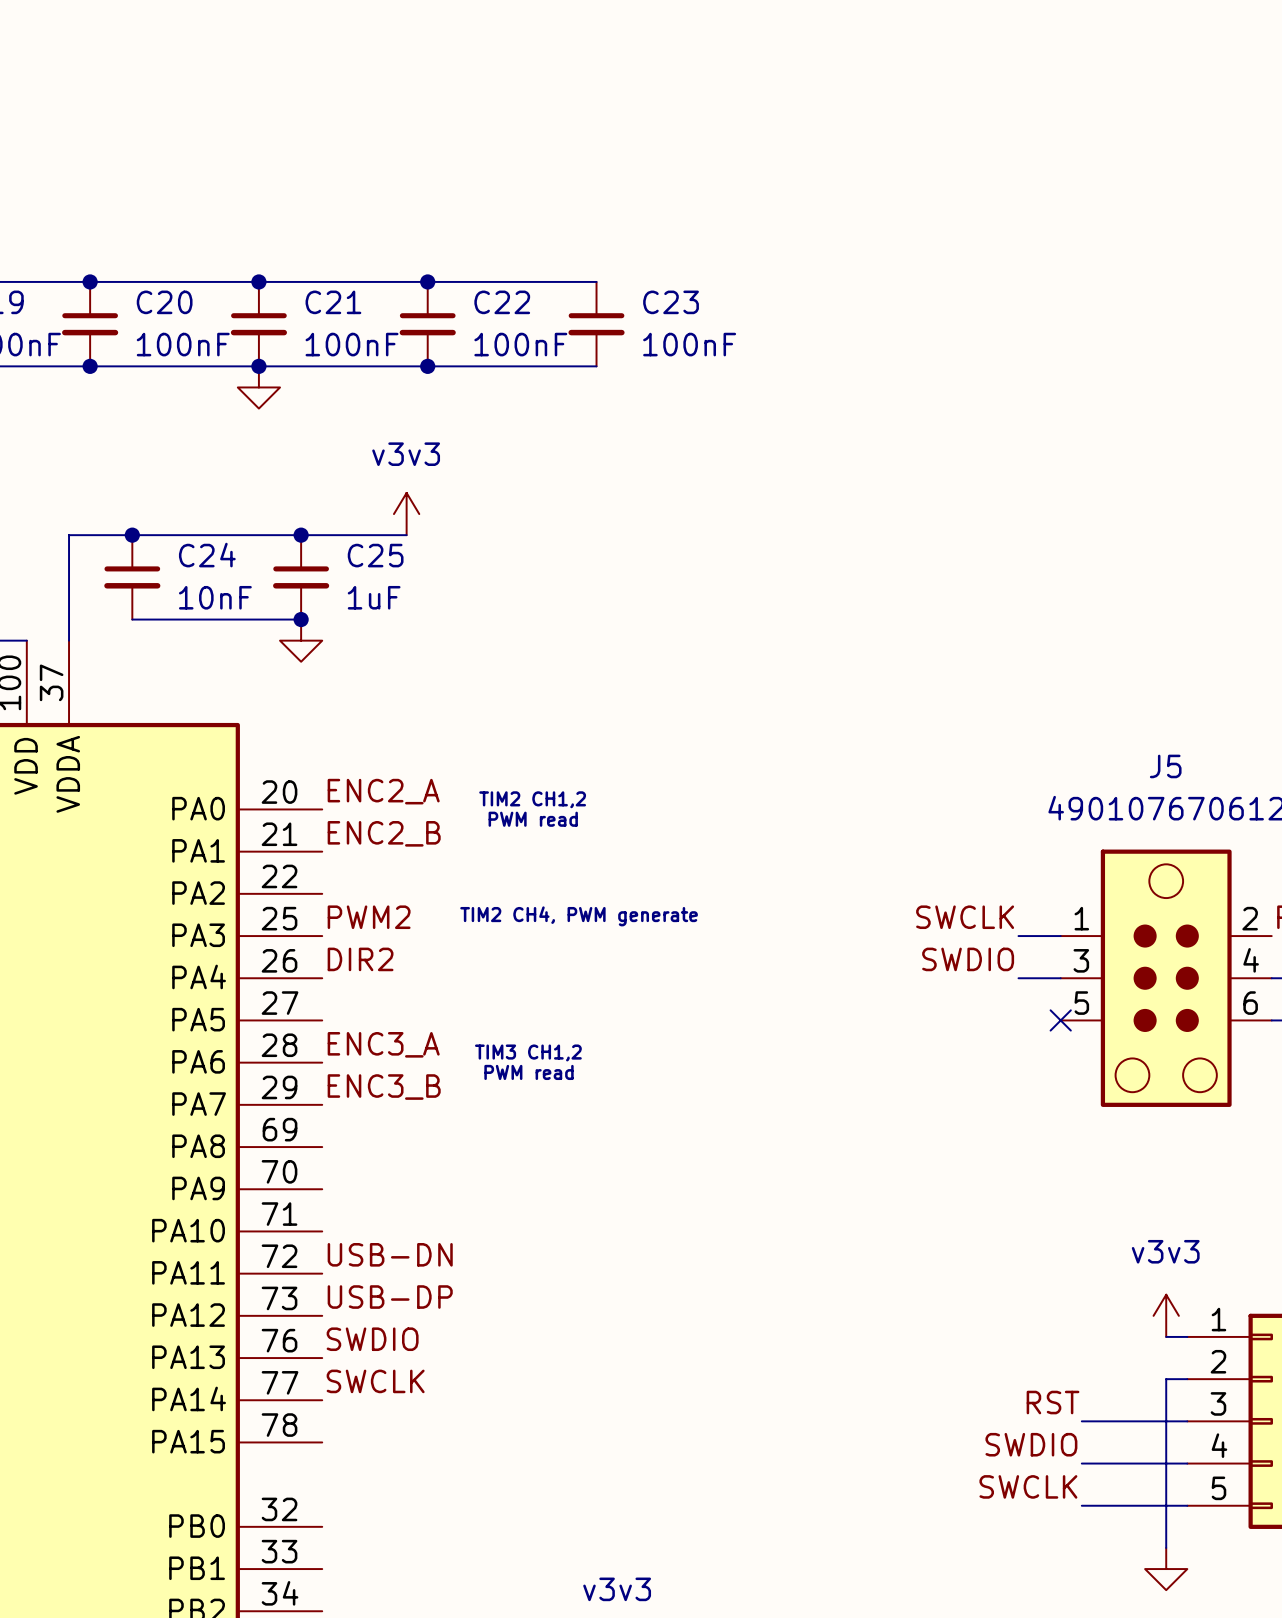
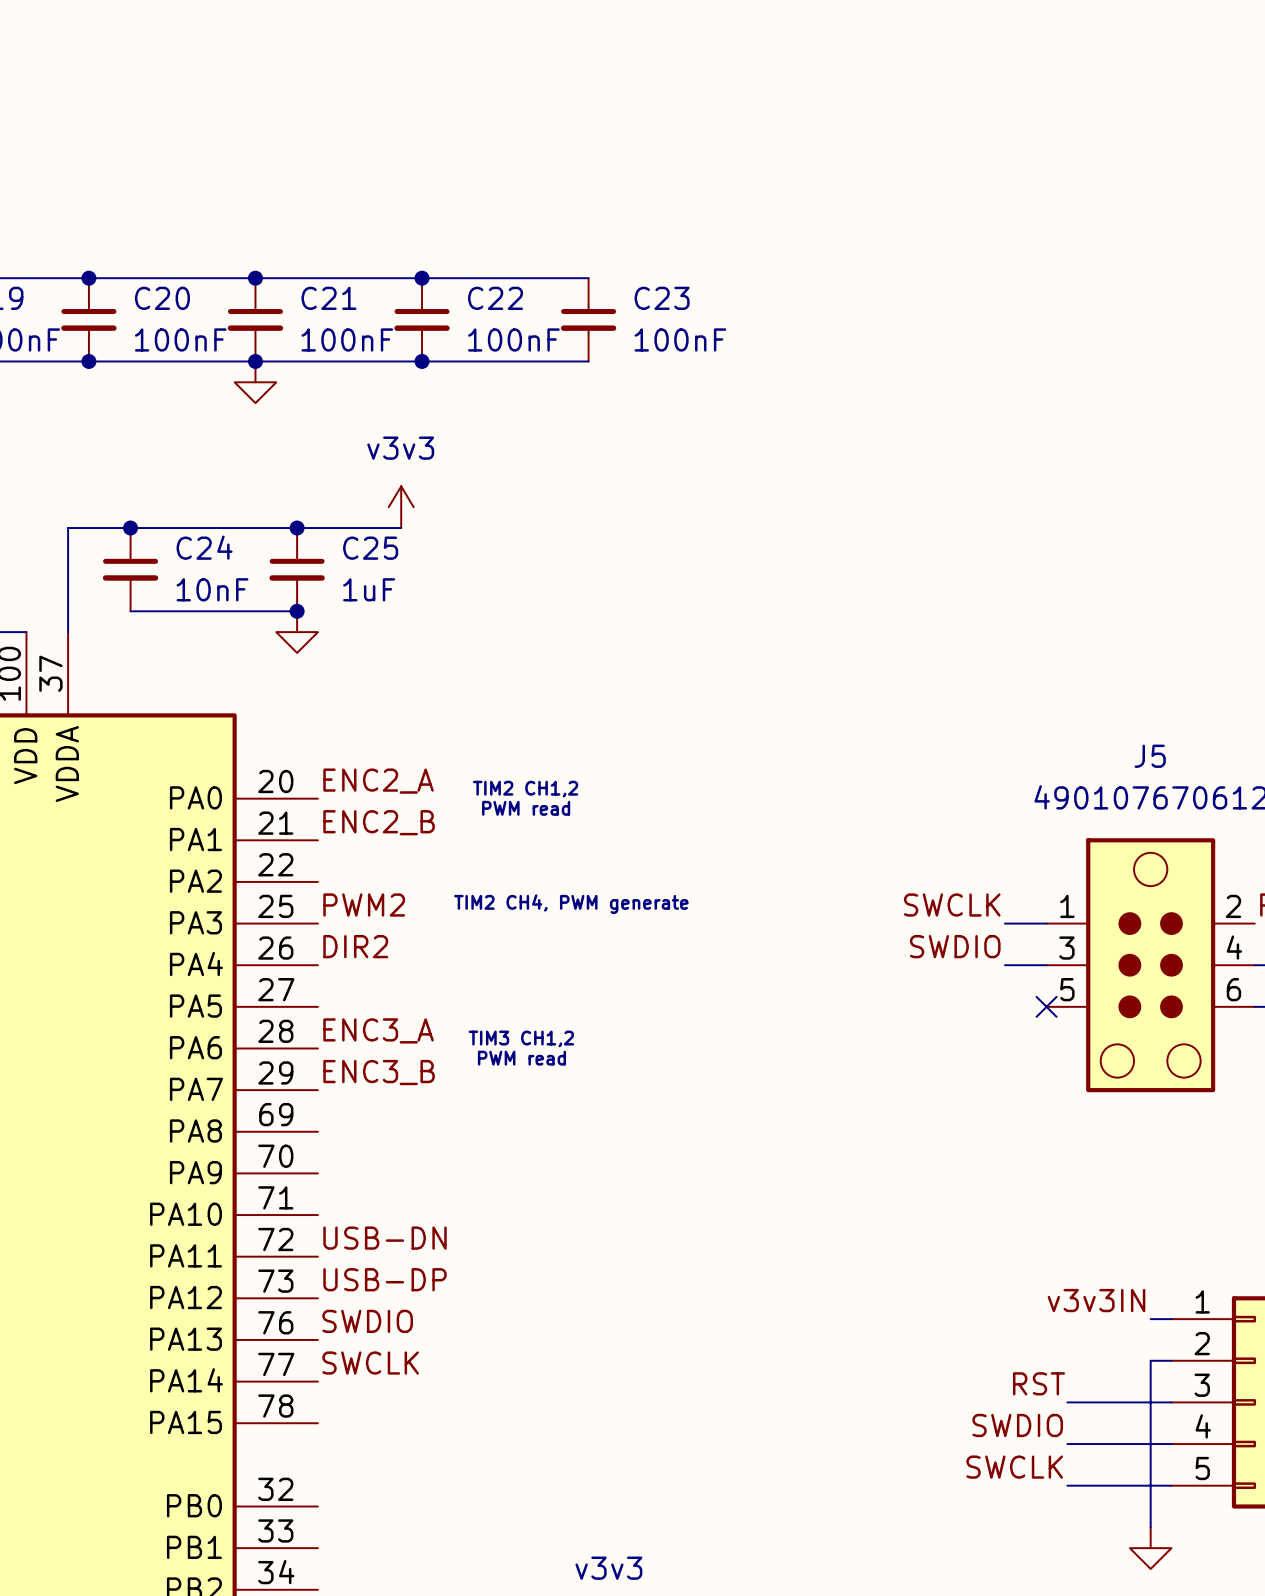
power symbol: v3v3 (1166, 1315) -> none
label: none -> v3v3IN (1096, 1300)

